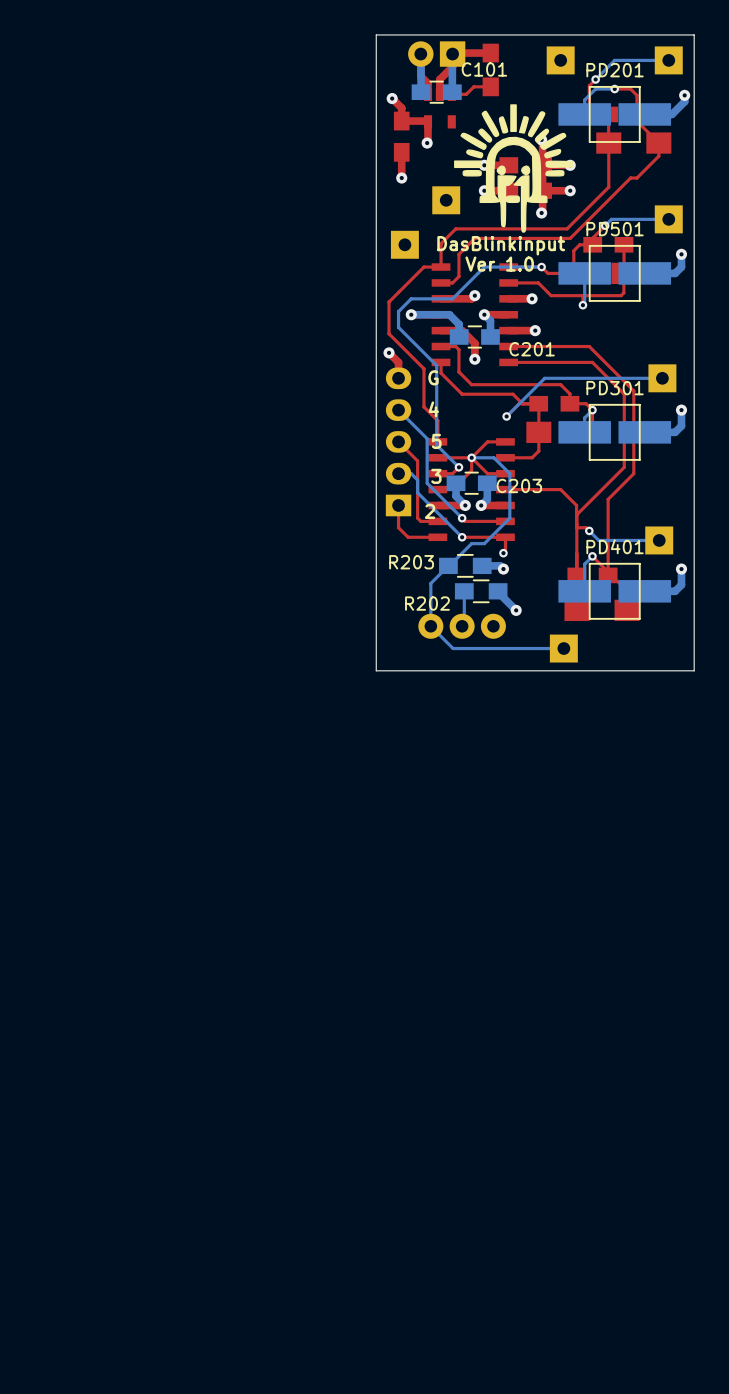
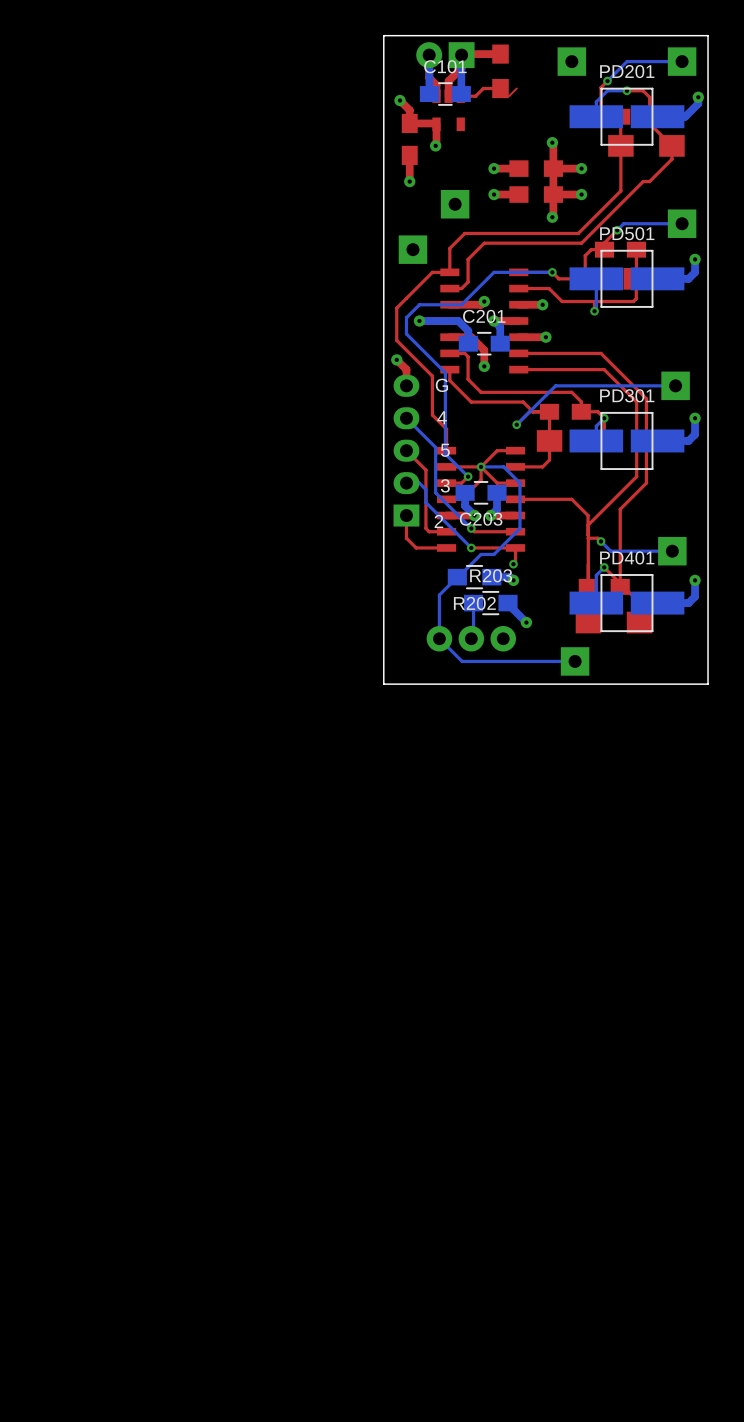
C101 name position: C101 (484, 69) -> C101 (445, 66)
top track: none -> (516, 88) (509, 96)
drawing: [454, 104, 574, 233] -> none
text: DasBlinkinput (501, 245) -> none
text: Ver 1.0 (499, 264) -> none
C201 name position: C201 (532, 349) -> C201 (484, 316)
C203 name position: C203 (519, 485) -> C203 (481, 519)
R203 name position: R203 (411, 562) -> R203 (491, 575)
R202 name position: R202 (427, 603) -> R202 (474, 603)

